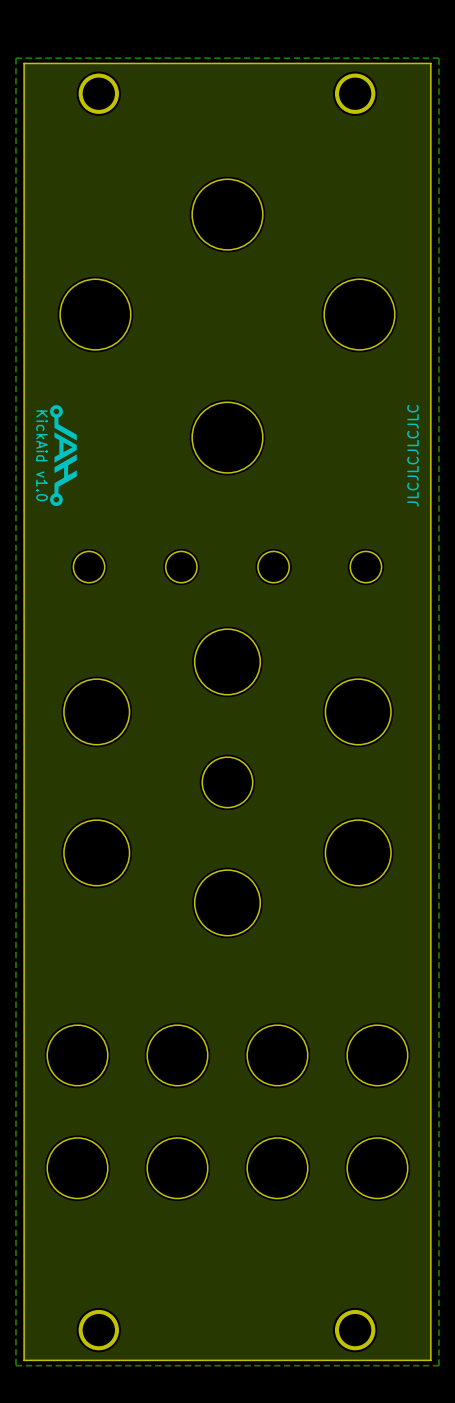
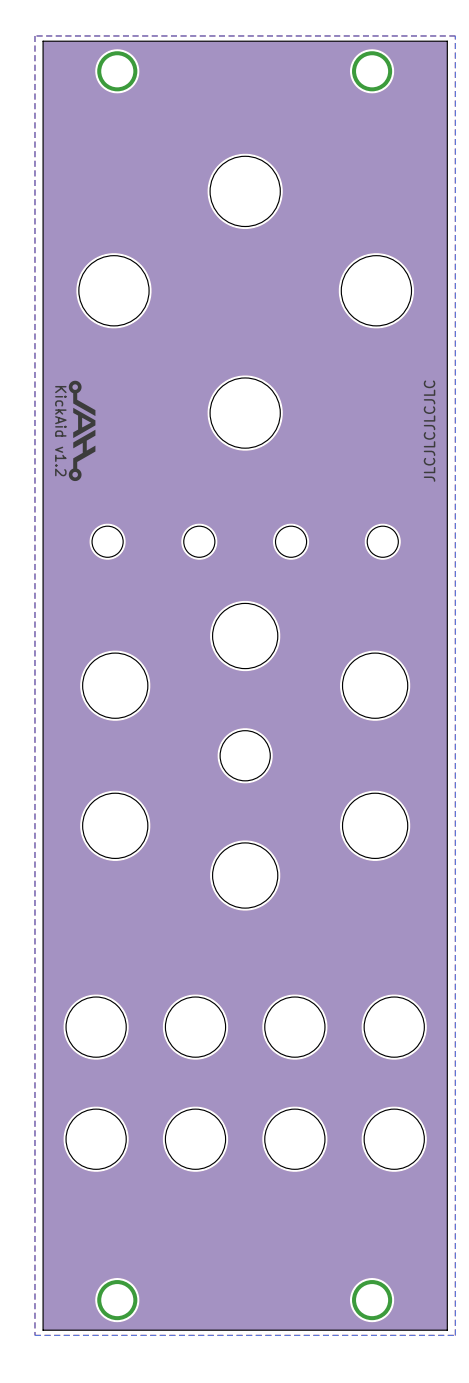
text: KickAid v1.0 (42, 455) -> KickAid v1.2 (60, 431)

